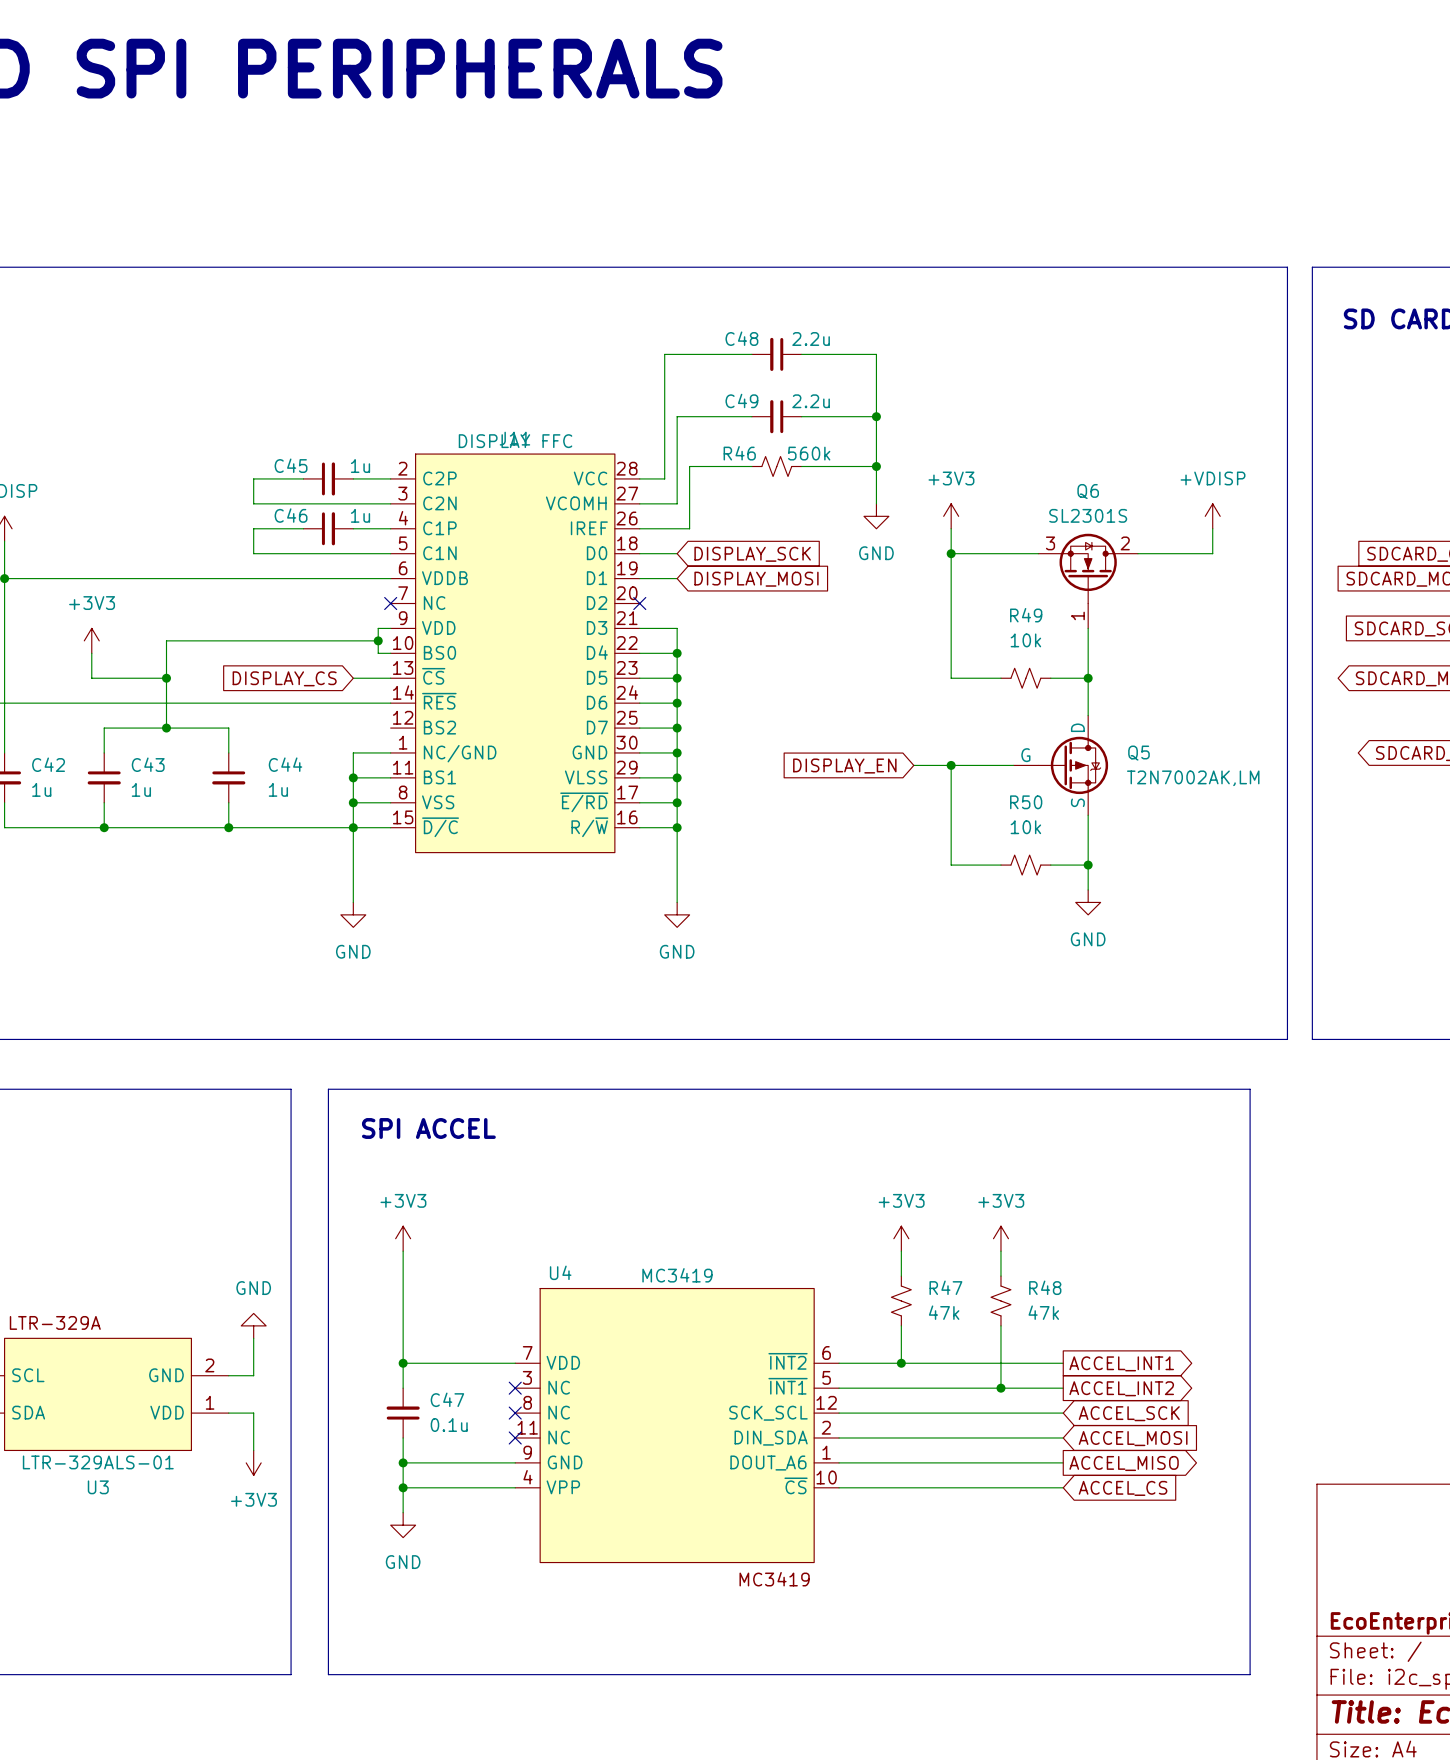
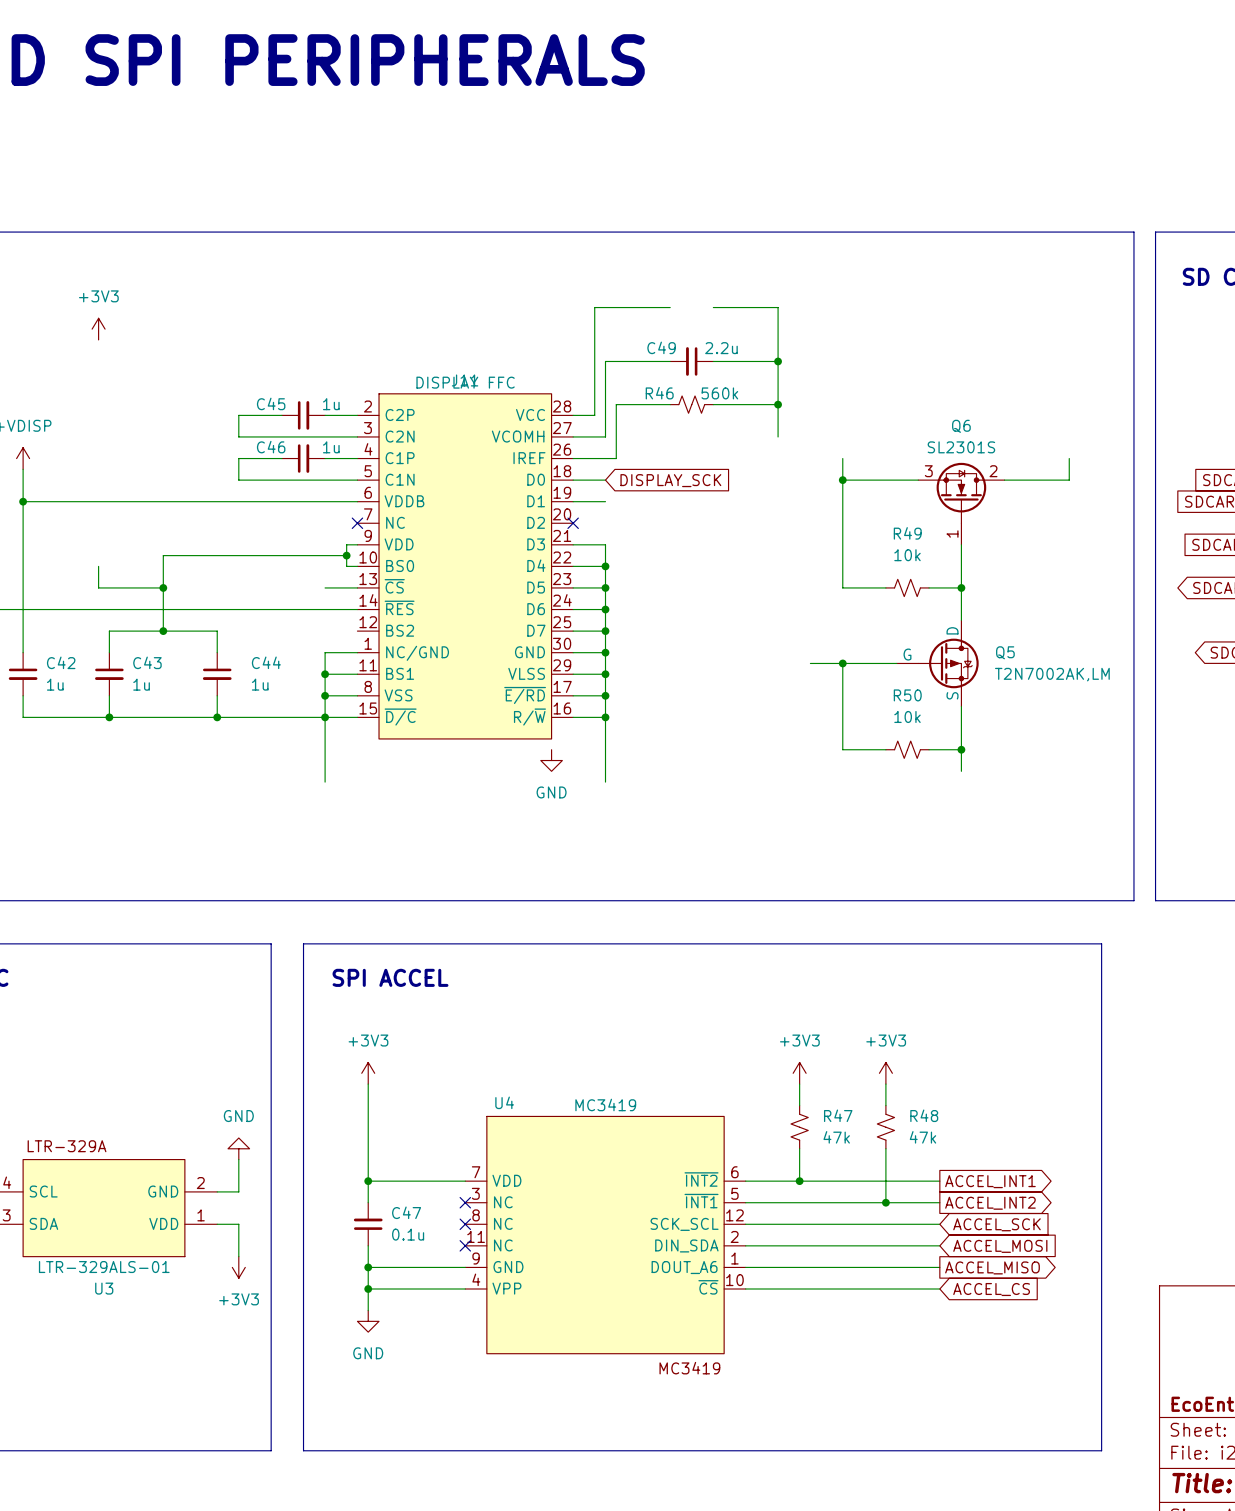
C48: 2.2u (776, 354) -> none
power symbol: none -> +3V3 (98, 329)
power symbol: GND (876, 516) -> none
power symbol: +3V3 (951, 516) -> none
power symbol: +VDISP (1212, 516) -> none
global label: DISPLAY_MOSI (756, 579) -> none
power symbol: +3V3 (91, 640) -> none
global label: DISPLAY_CS (284, 678) -> none
global label: DISPLAY_EN (844, 766) -> none
power symbol: GND (1088, 902) -> none
power symbol: GND (353, 914) -> none
power symbol position: GND (677, 914) -> GND (551, 760)

